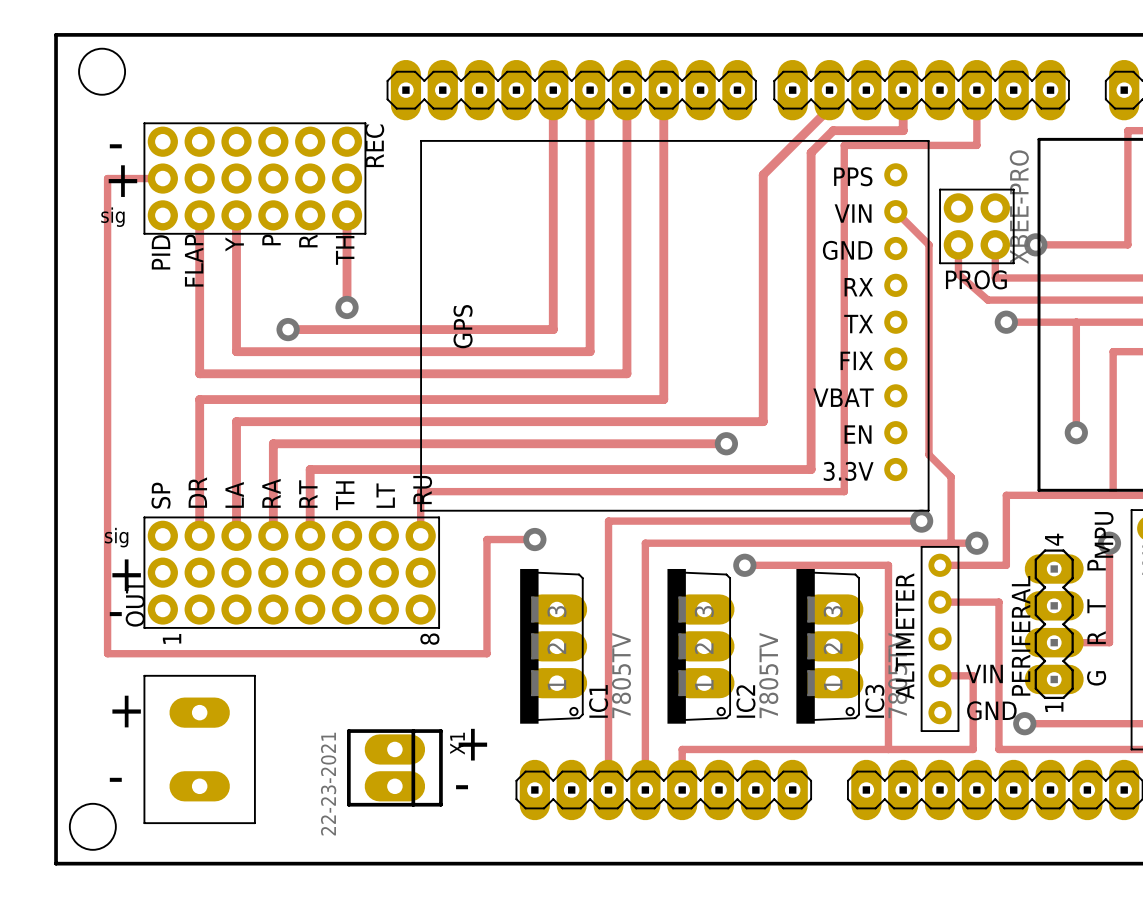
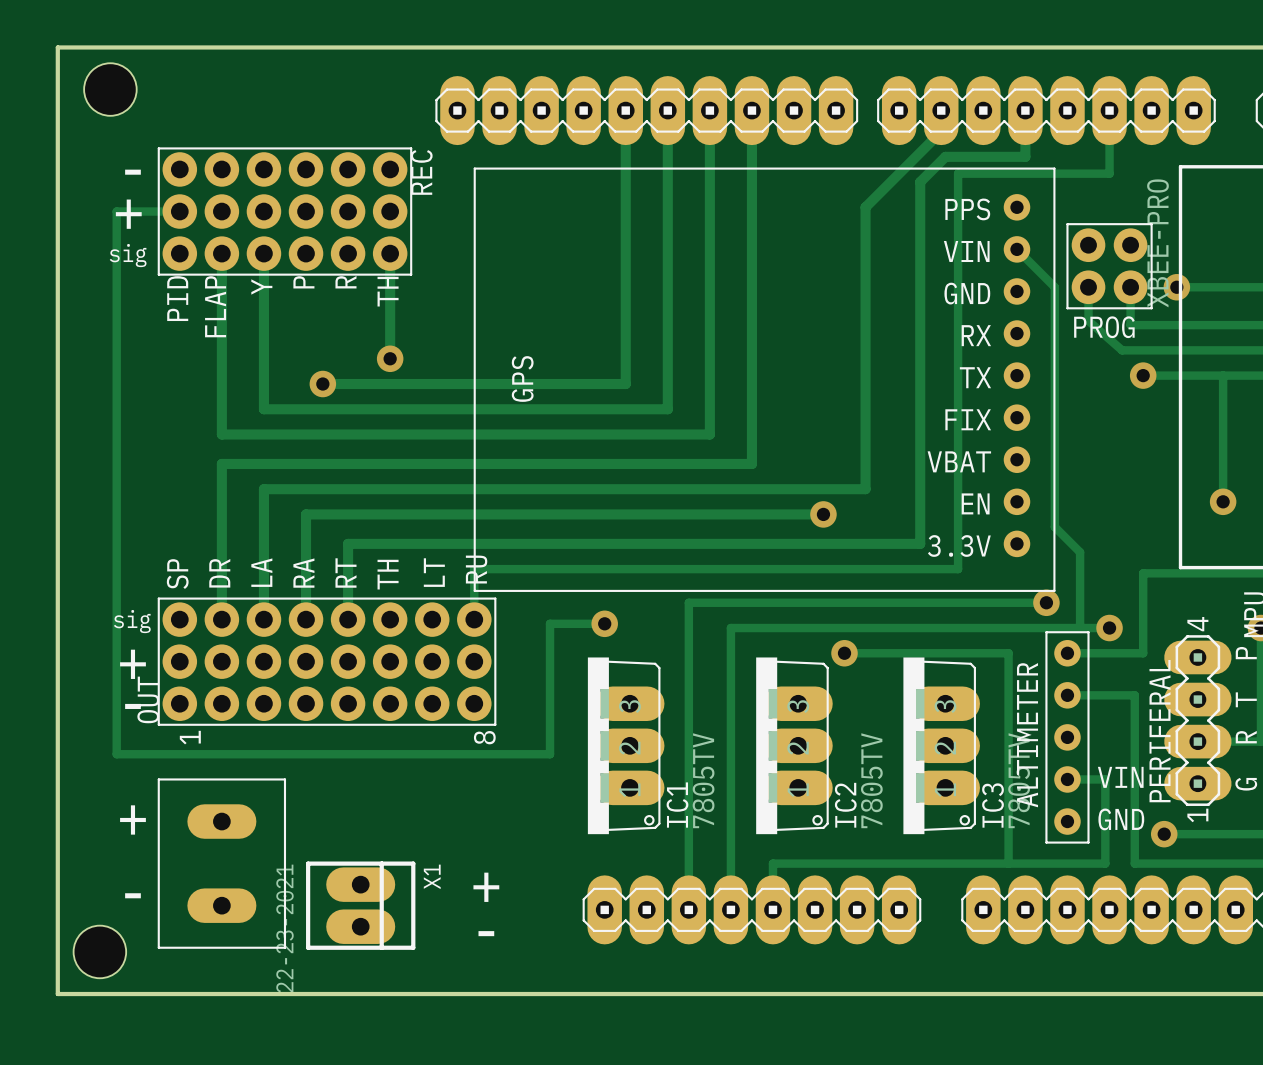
text position: + (472, 744) -> + (486, 887)
X1 position: (394, 767) -> (360, 905)
text position: - (462, 787) -> - (486, 933)

